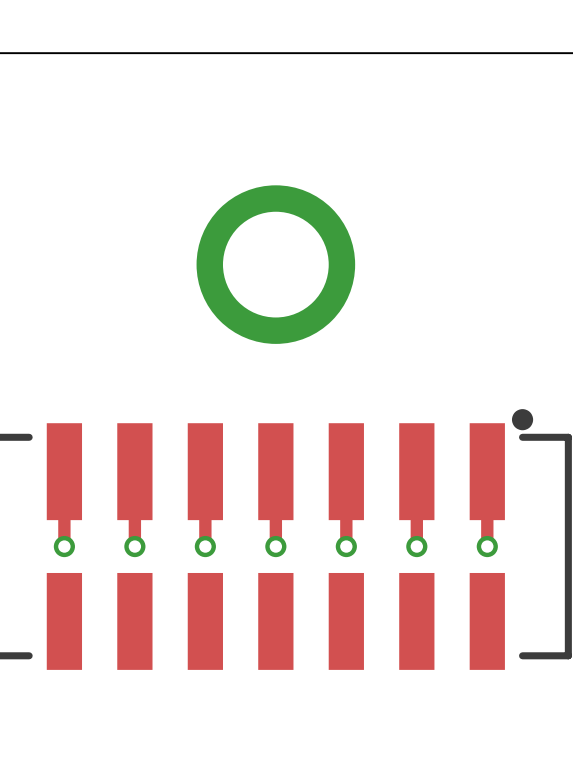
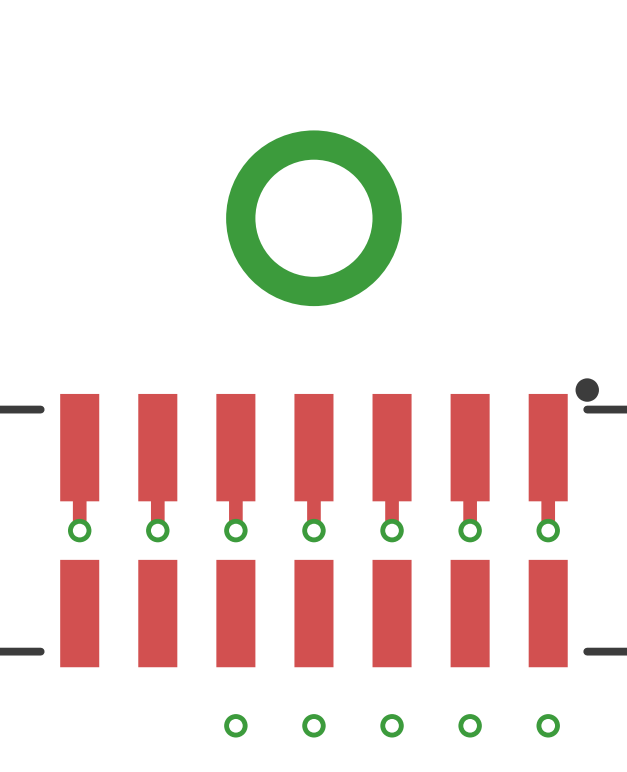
via: none -> (235, 725)
via: none -> (313, 725)
via: none -> (392, 725)
via: none -> (470, 725)
via: none -> (548, 725)

